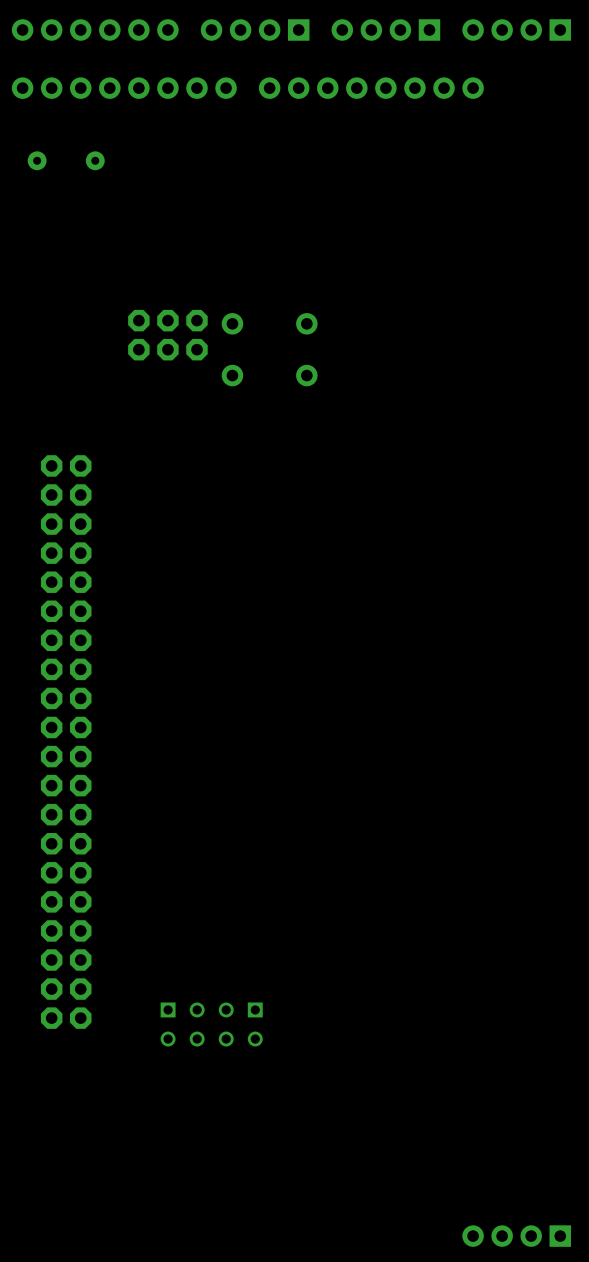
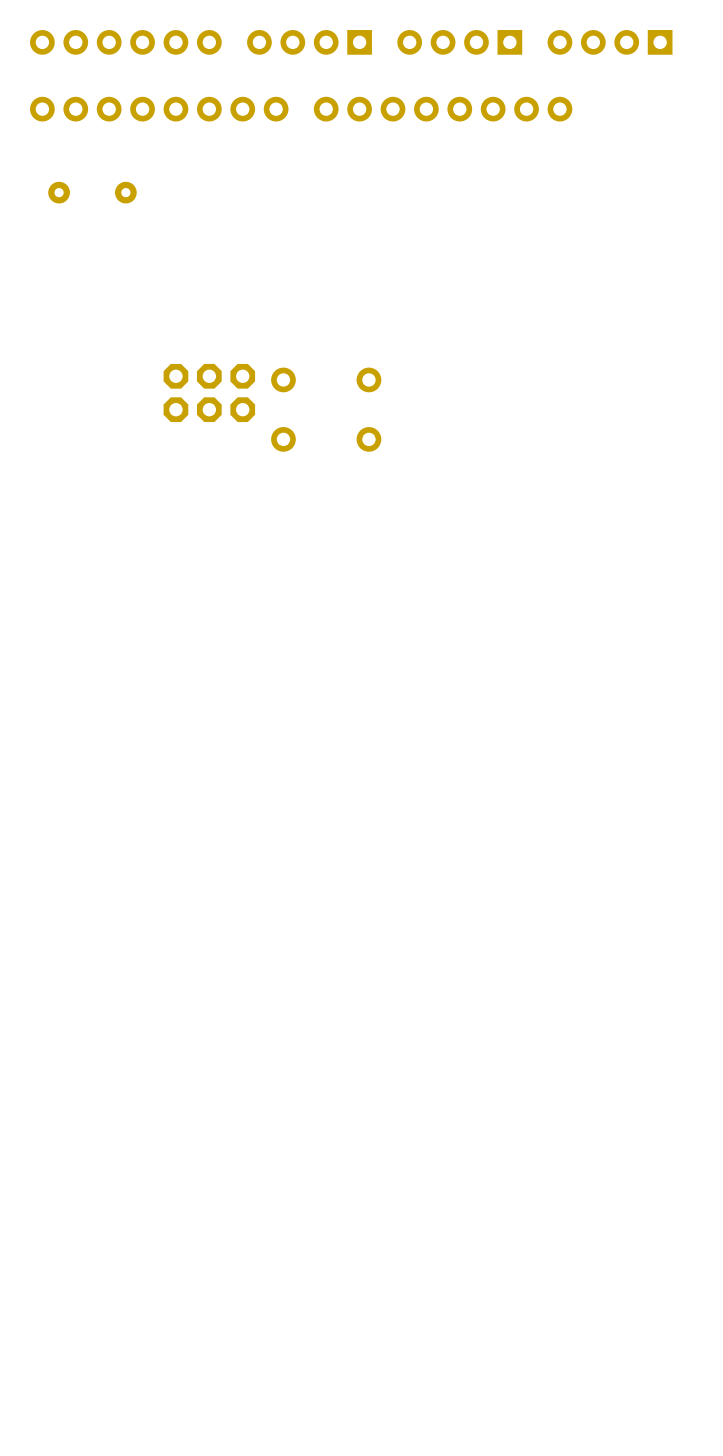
part: (66, 742) -> none
part: (211, 1024) -> none
part: (516, 1236) -> none

